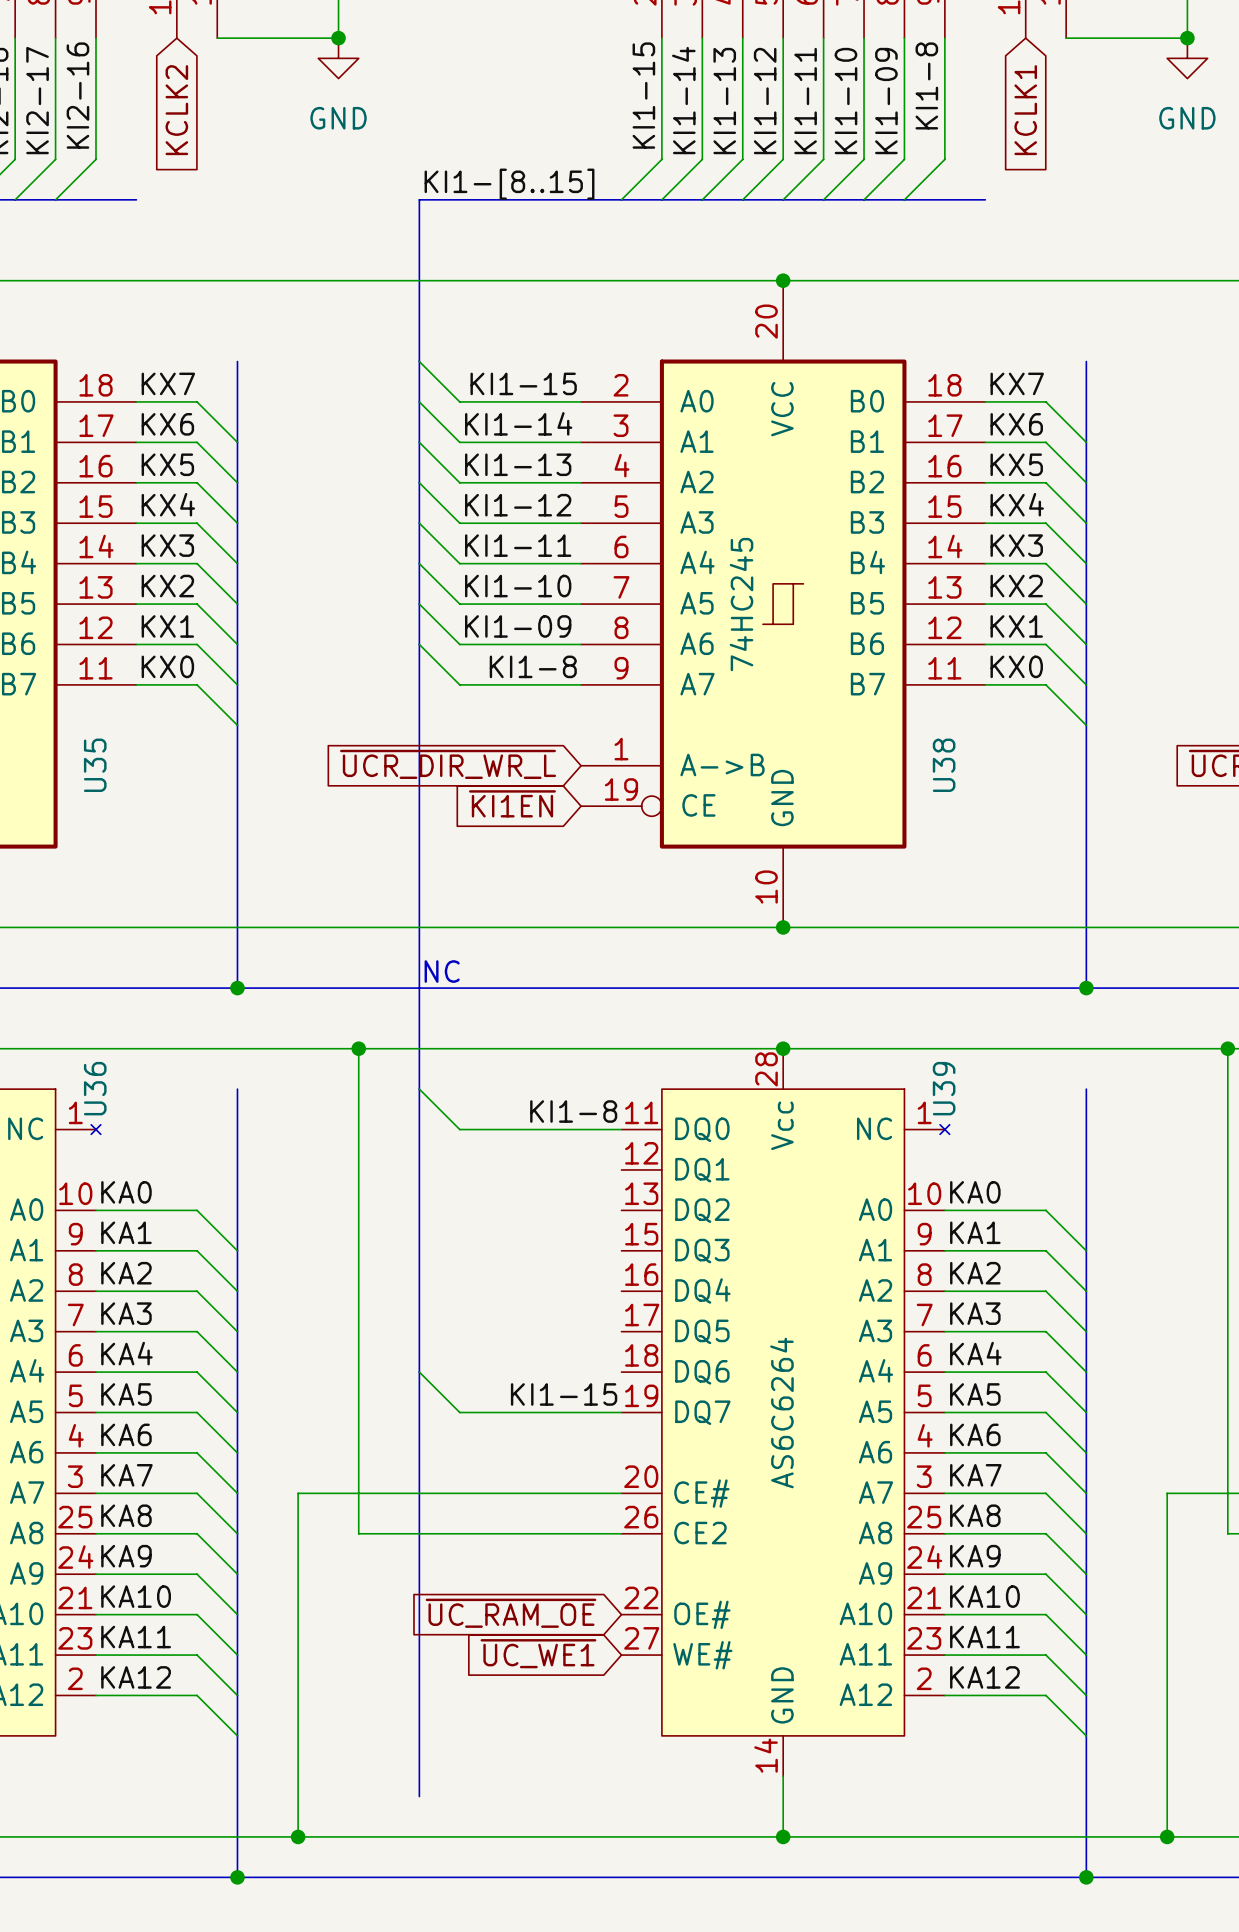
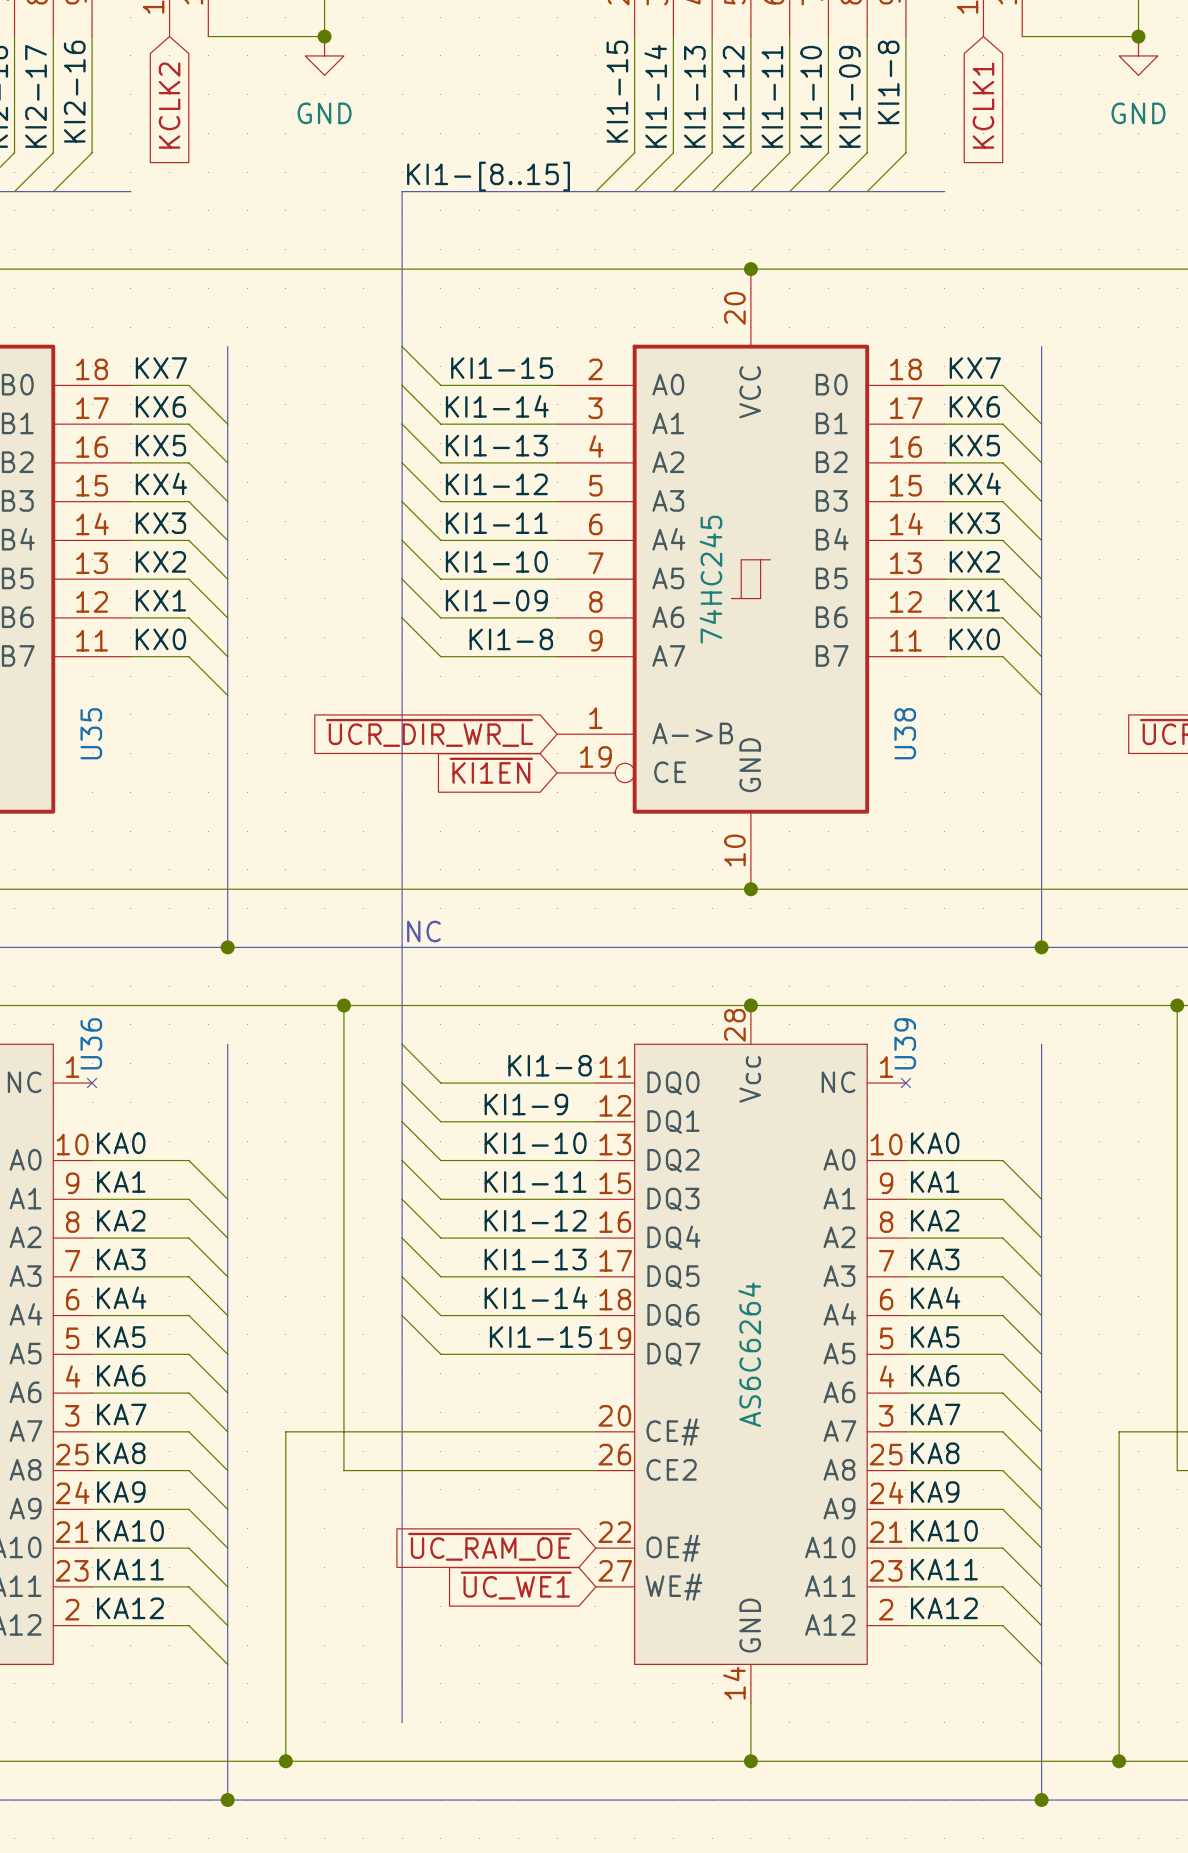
wire: none -> (402, 1083) (440, 1121) (595, 1121)
label: none -> KI1-9 (526, 1104)
wire: none -> (402, 1121) (440, 1160) (595, 1160)
label: none -> KI1-10 (535, 1143)
wire: none -> (402, 1160) (440, 1199) (595, 1199)
label: none -> KI1-11 (535, 1182)
wire: none -> (402, 1199) (440, 1238) (595, 1238)
label: none -> KI1-12 (535, 1220)
wire: none -> (402, 1238) (440, 1276) (595, 1276)
label: none -> KI1-13 (535, 1259)
wire: none -> (402, 1276) (440, 1315) (595, 1315)
label: none -> KI1-14 (536, 1297)

